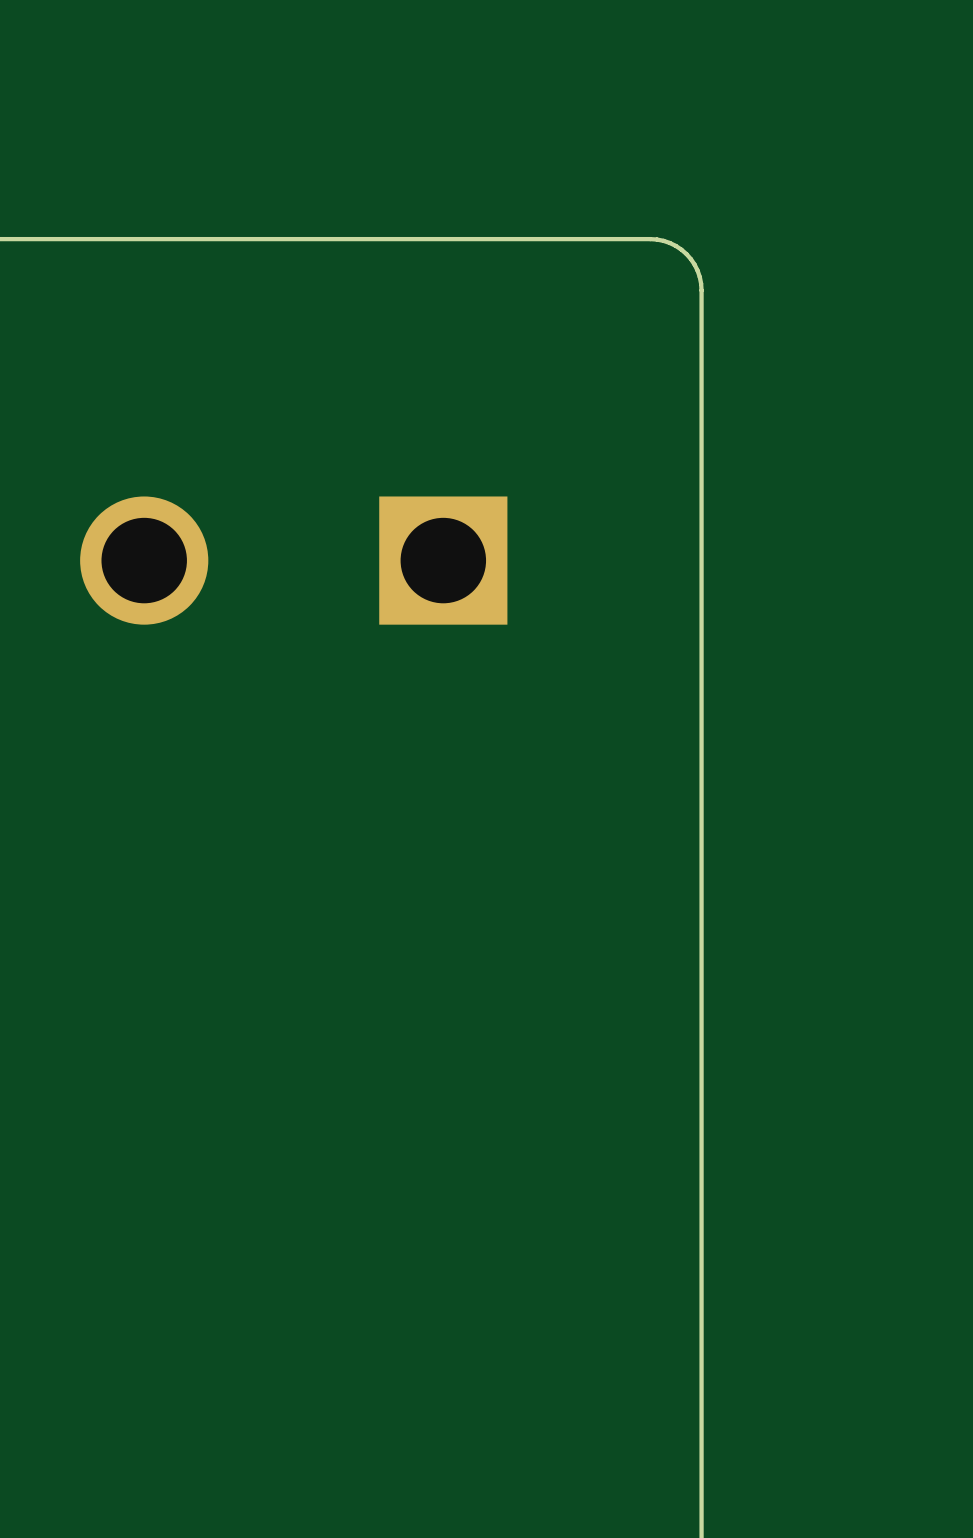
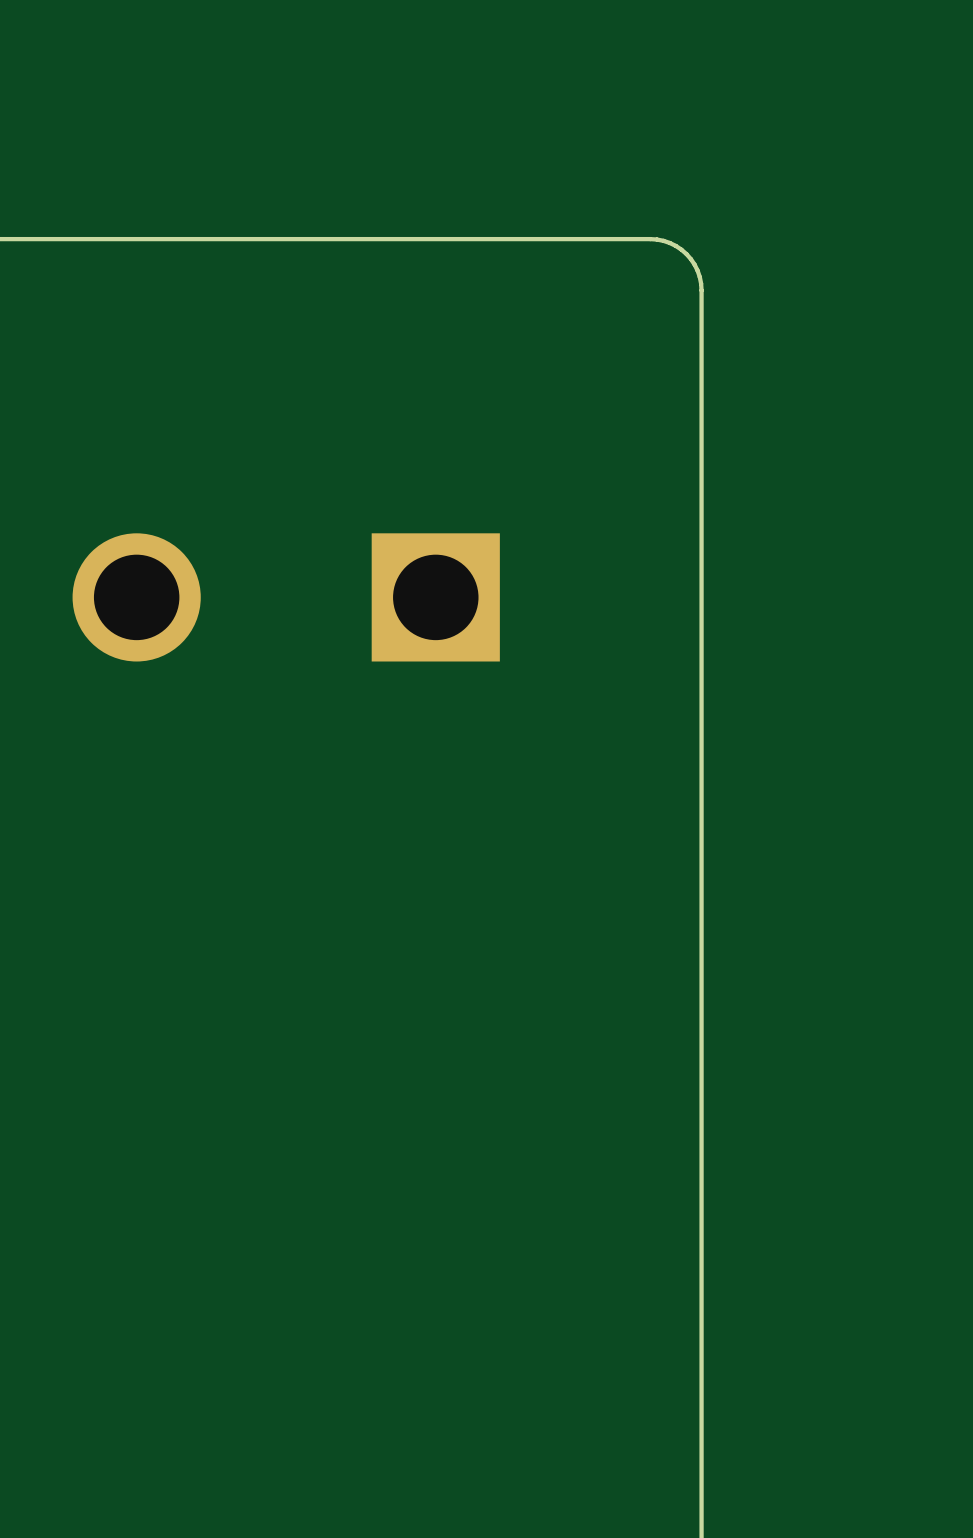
part position: (293, 560) -> (286, 597)

